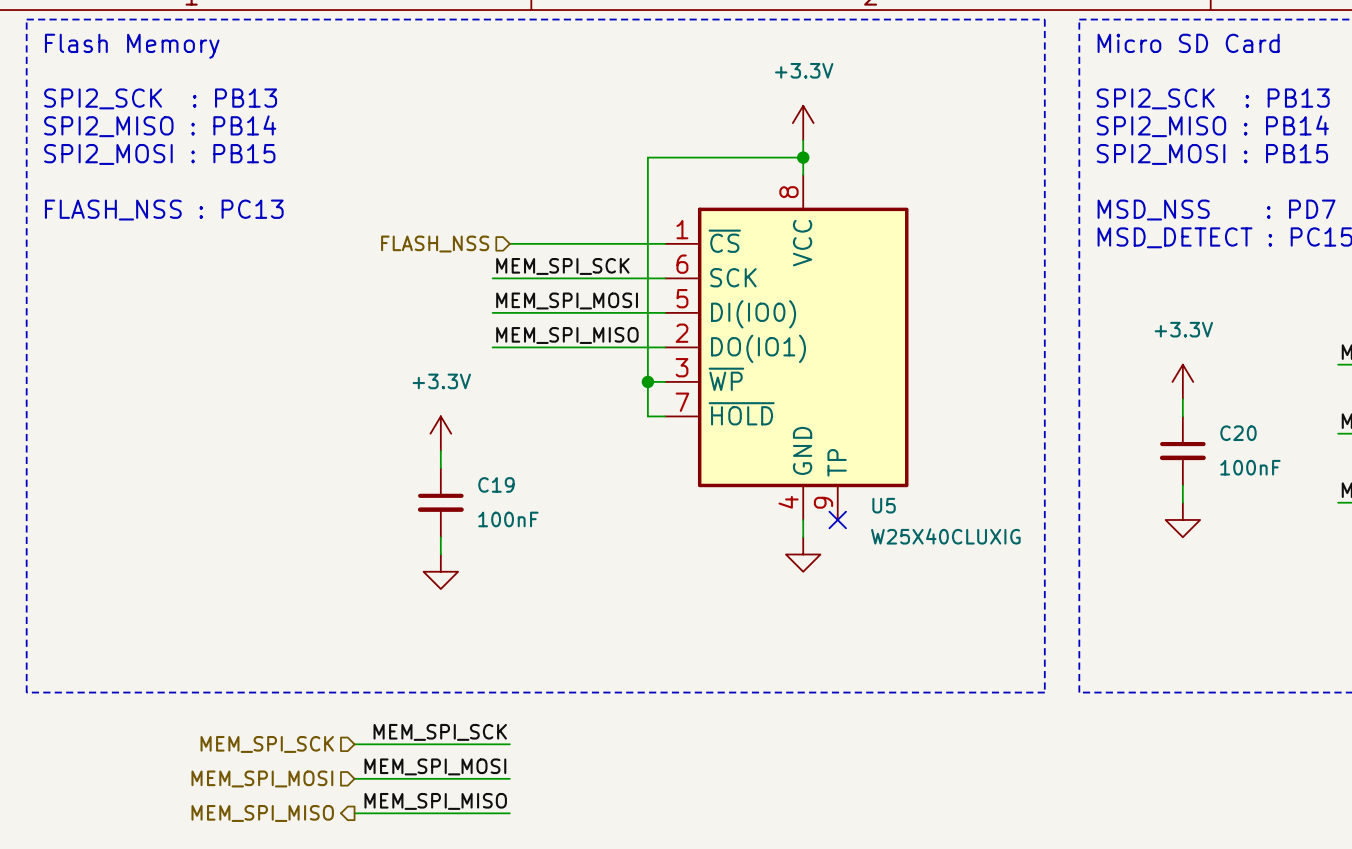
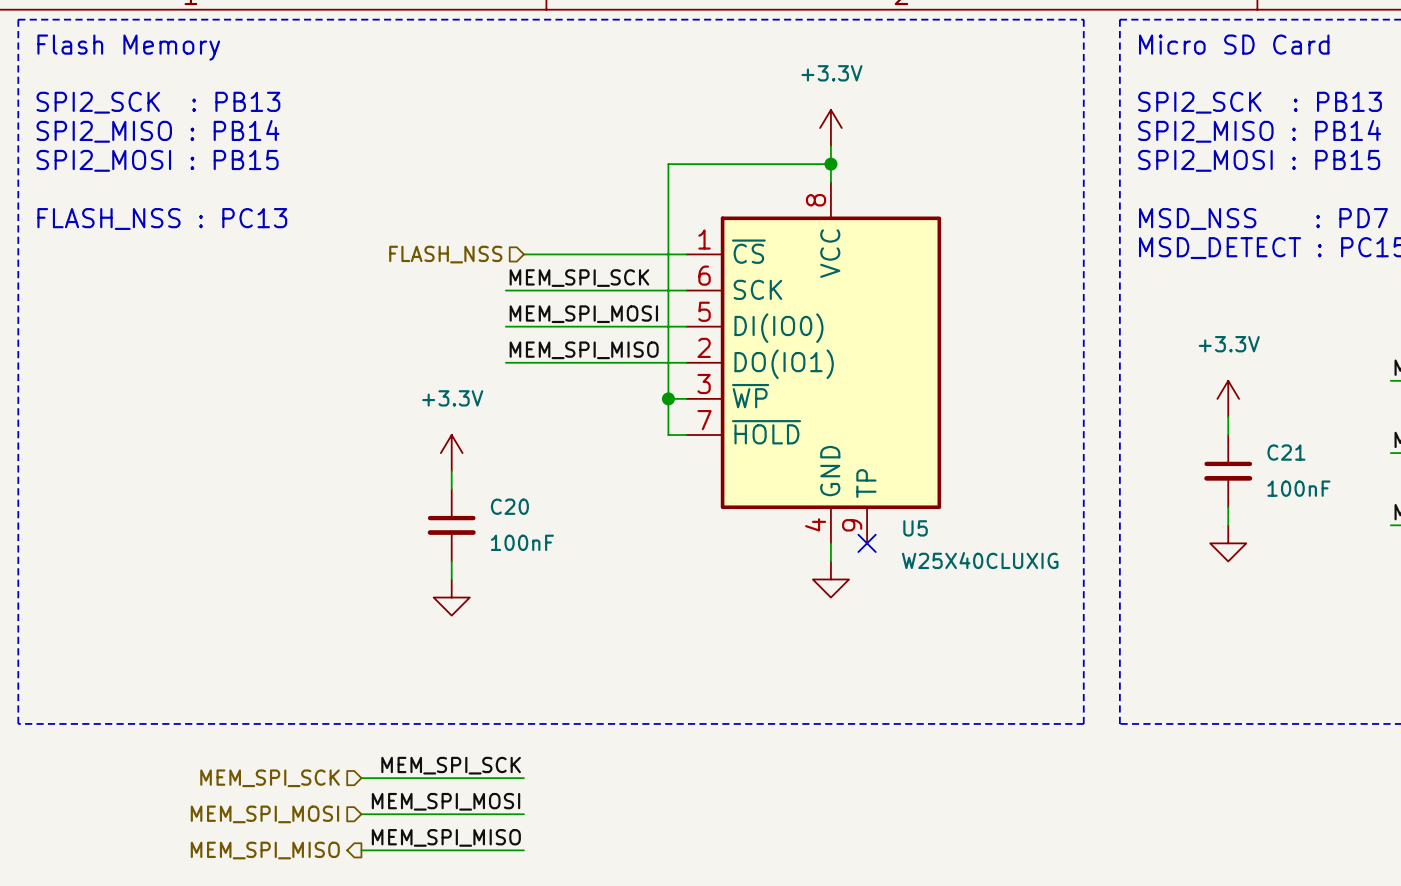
C20 name: C20 (1238, 433) -> C21 (1286, 452)
C19 name: C19 (496, 484) -> C20 (509, 506)

